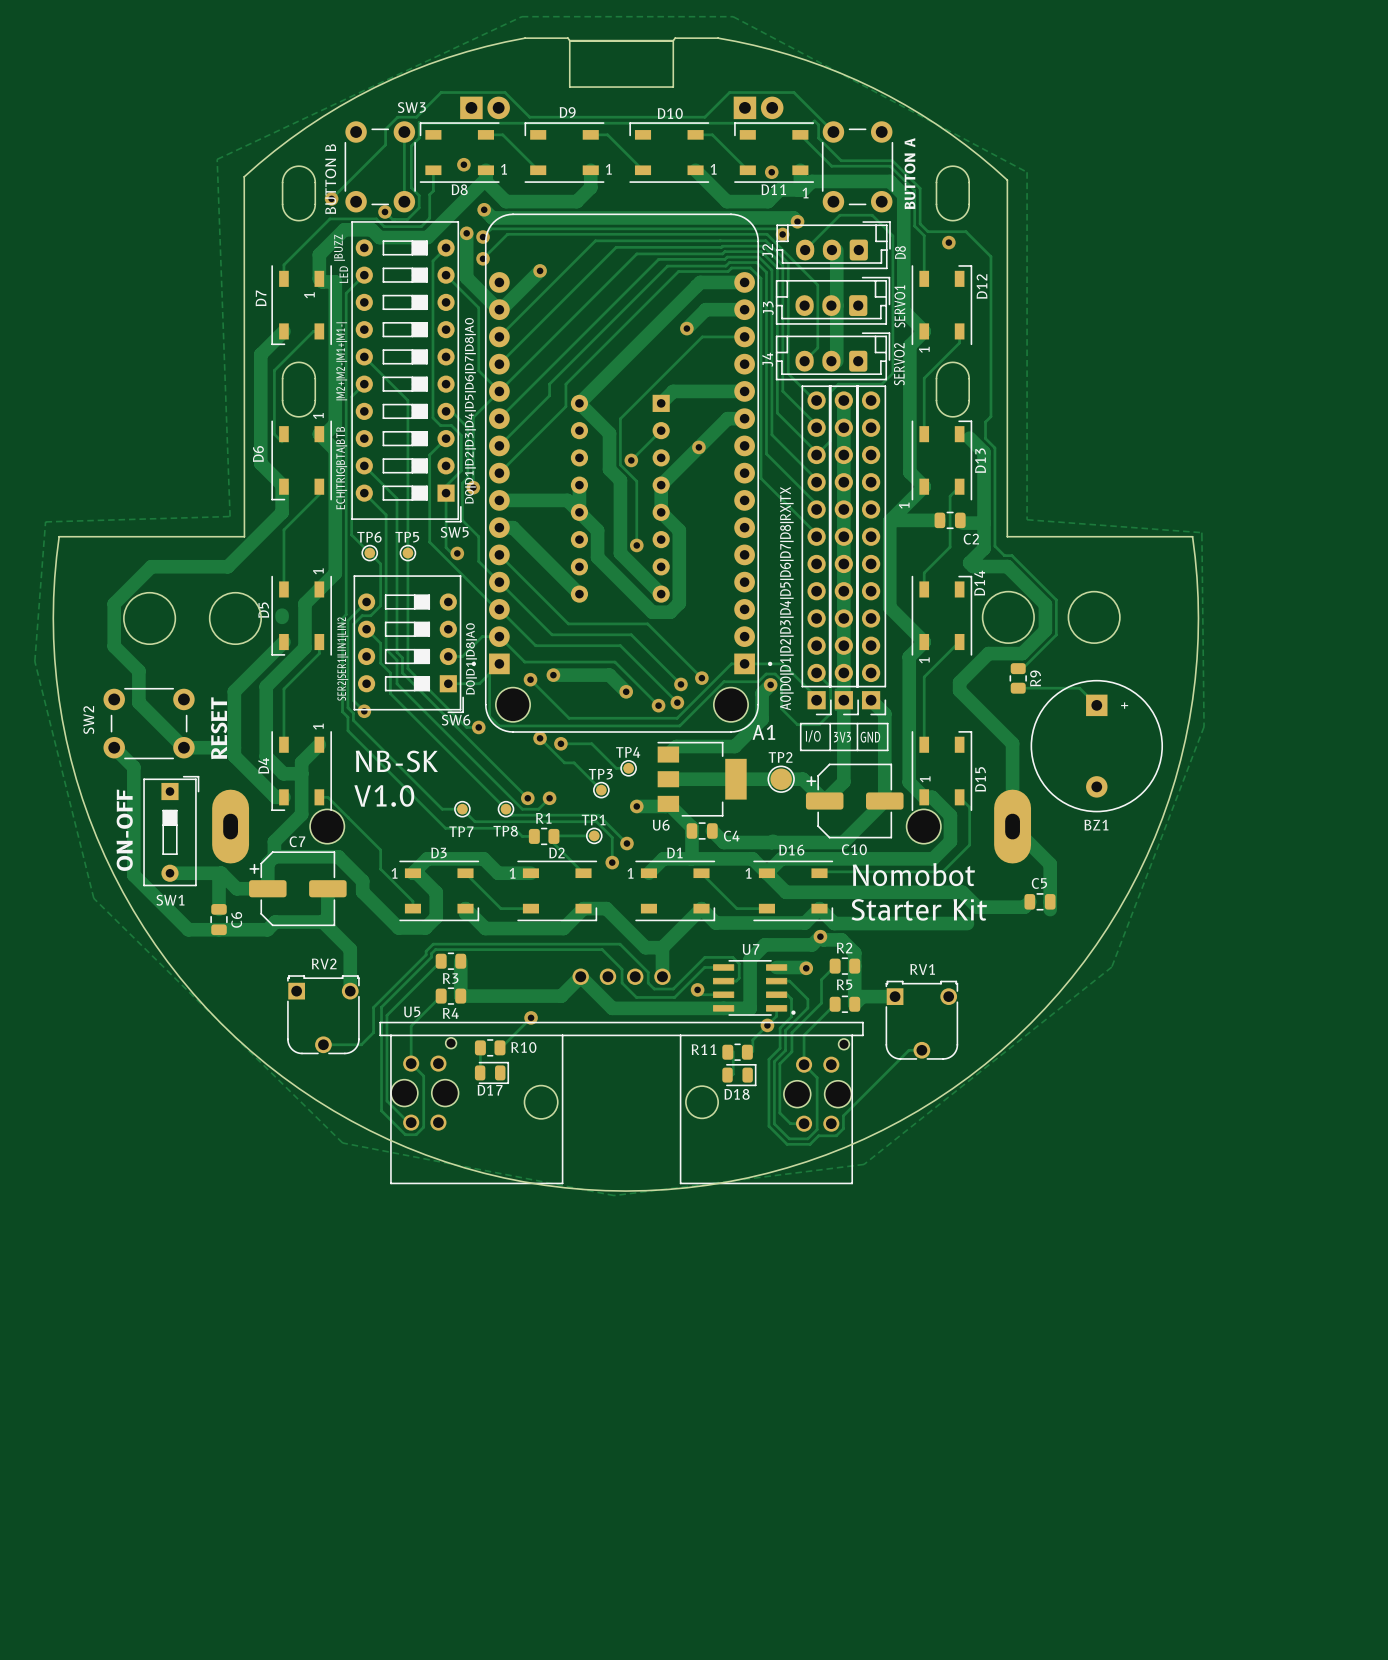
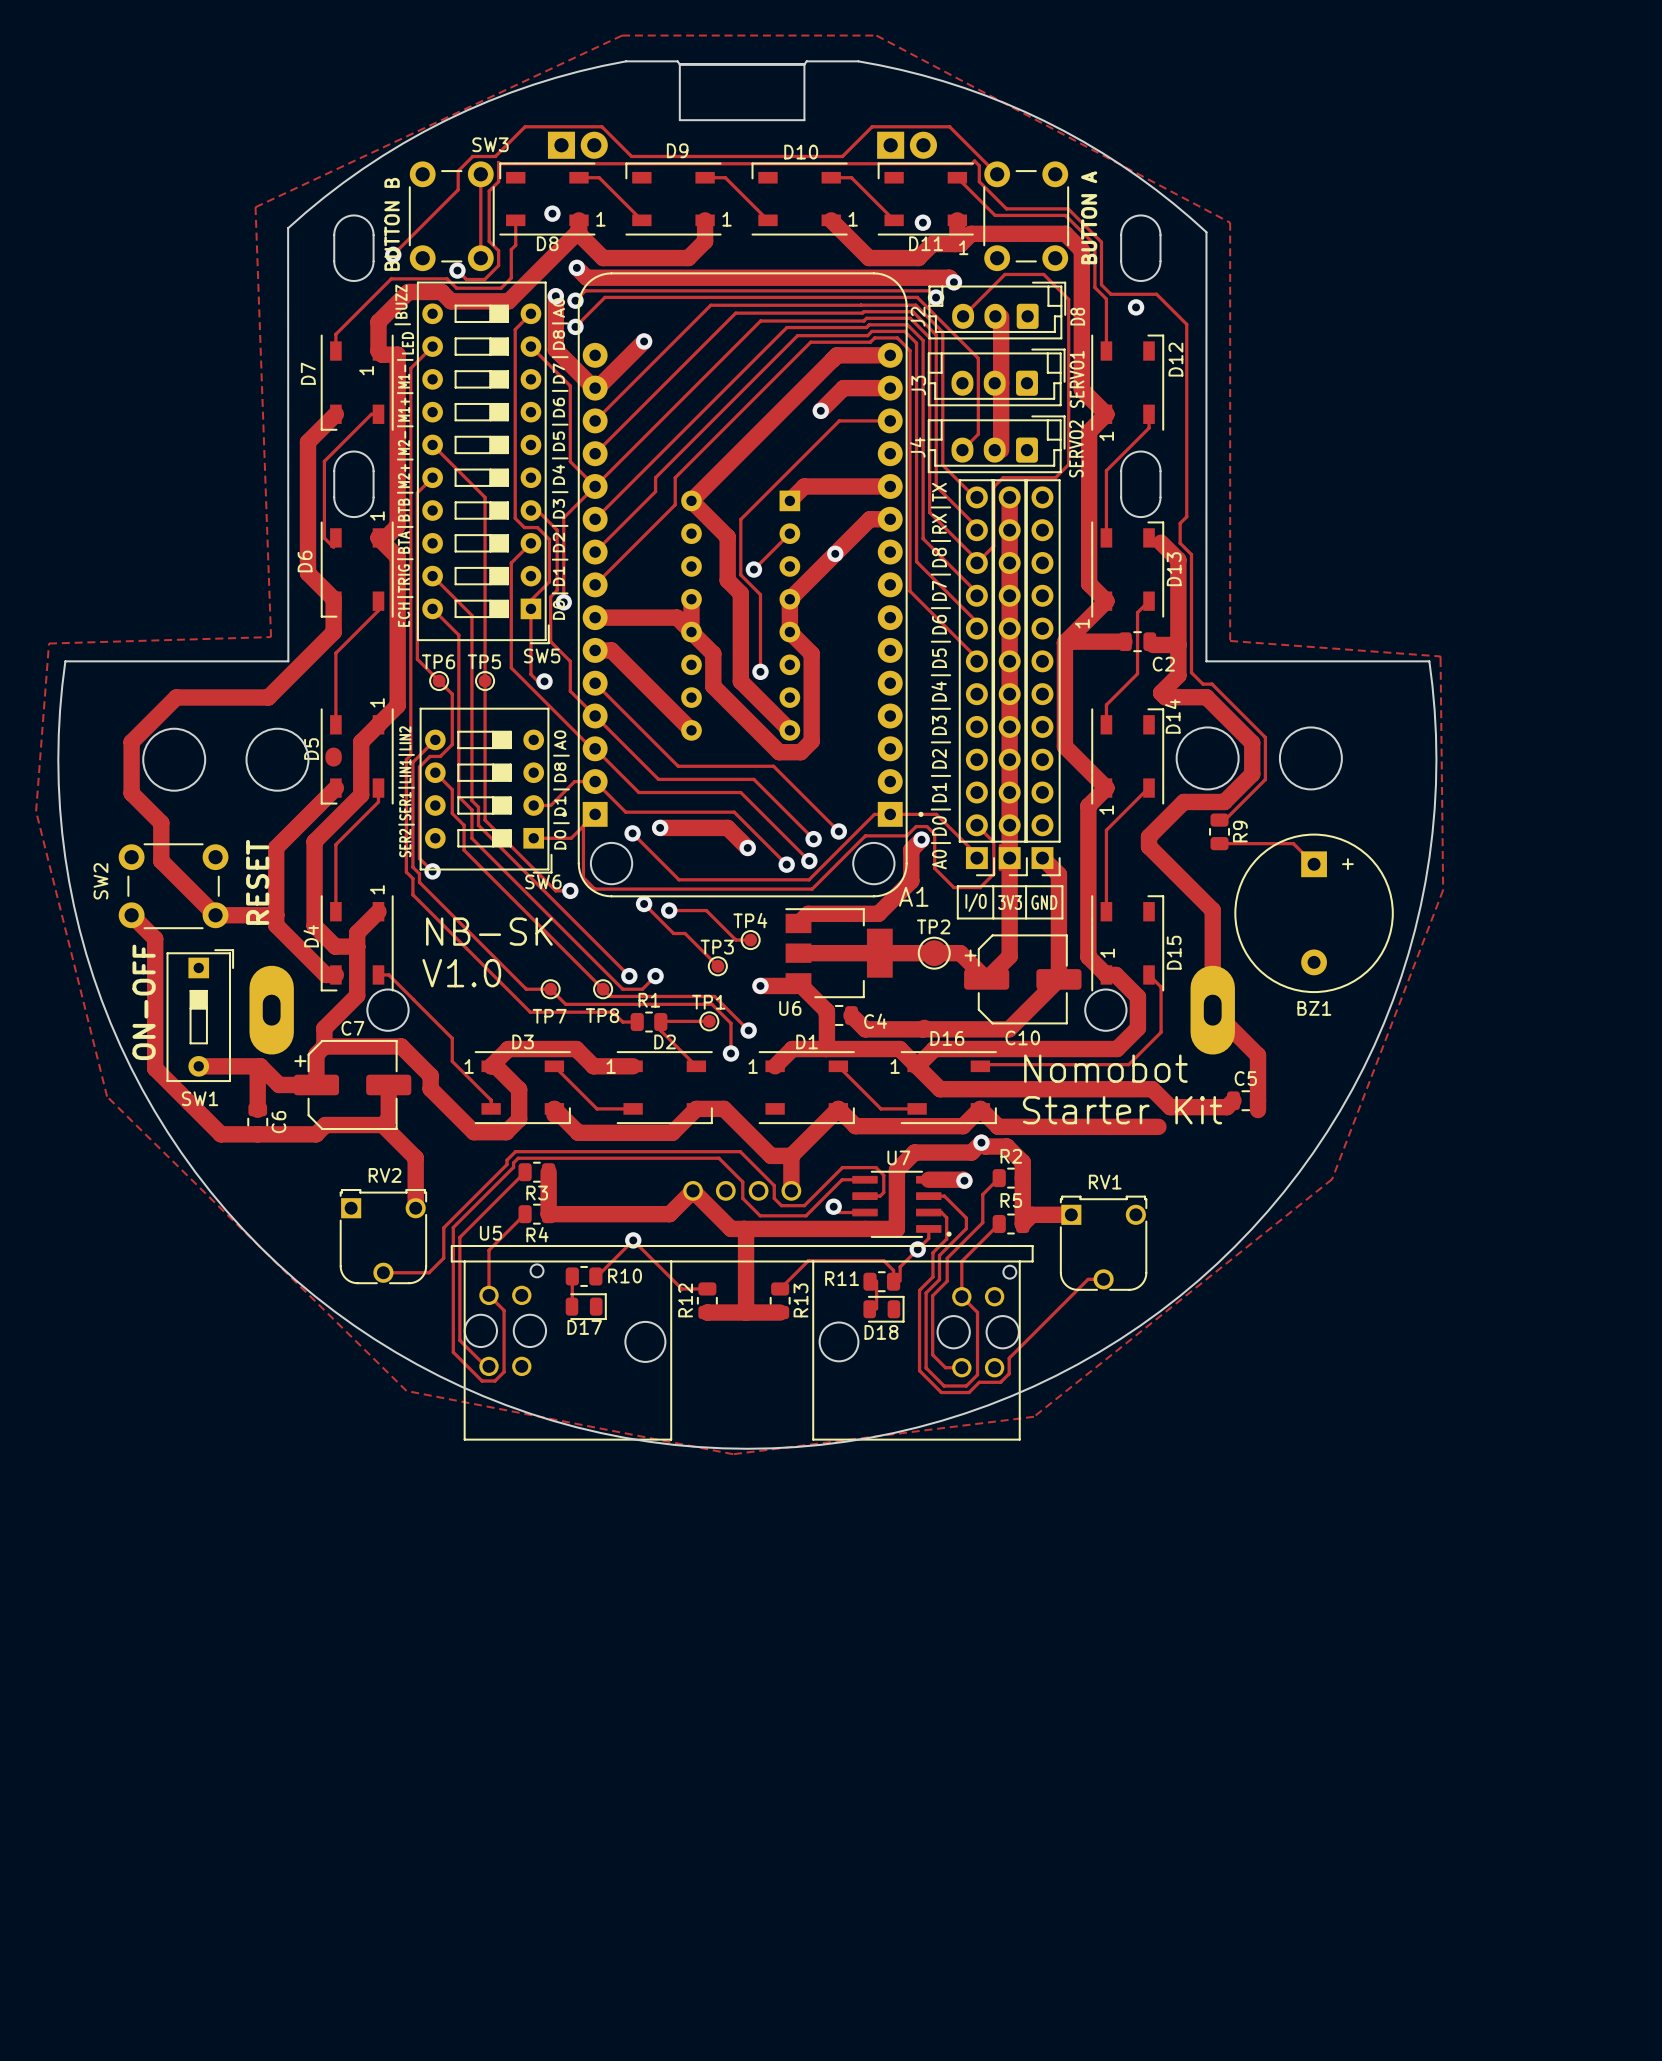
track: none -> (744, 1228) (746, 1230) (746, 1312)
track: none -> (633, 1240) (681, 1288) (707, 1288)
track: none -> (893, 1281) (893, 1270) (883, 1260) (808, 1260) (780, 1288)
R12: none -> (707, 1300)
R13: none -> (780, 1300)
track: none -> (707, 1312) (780, 1312)

